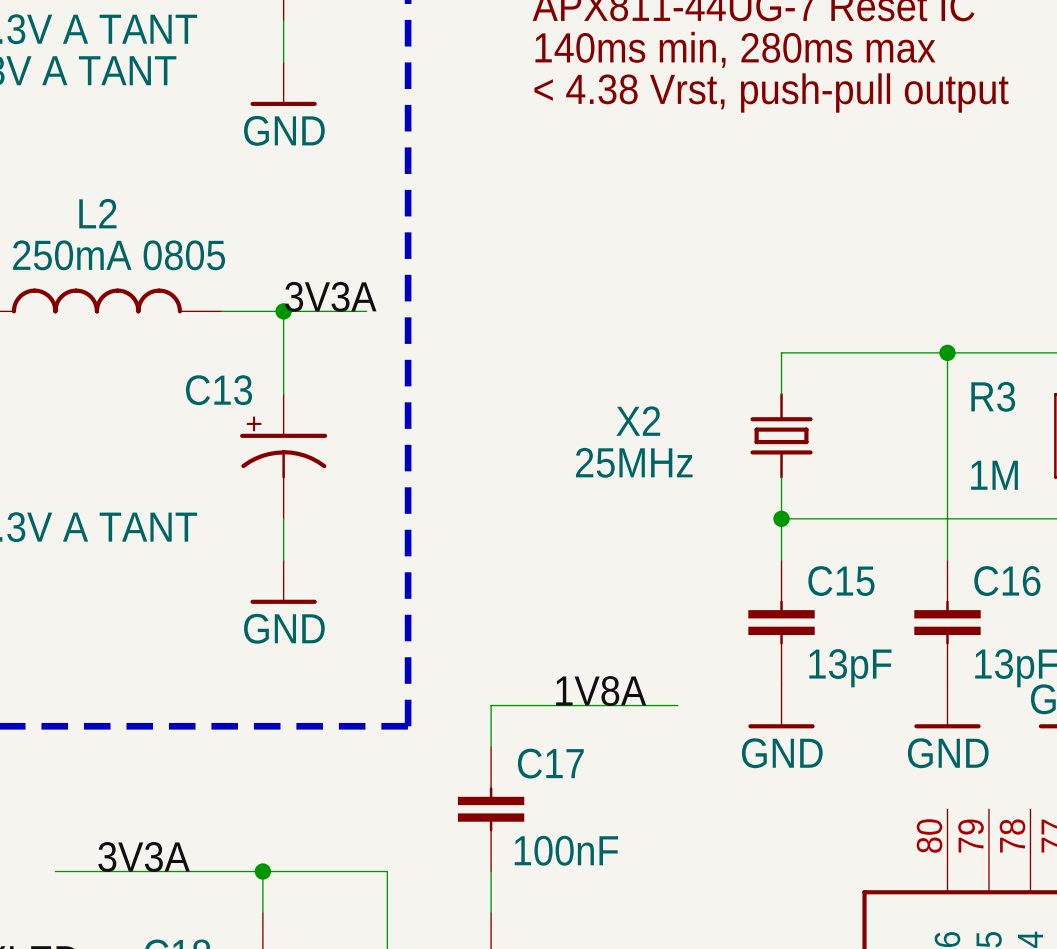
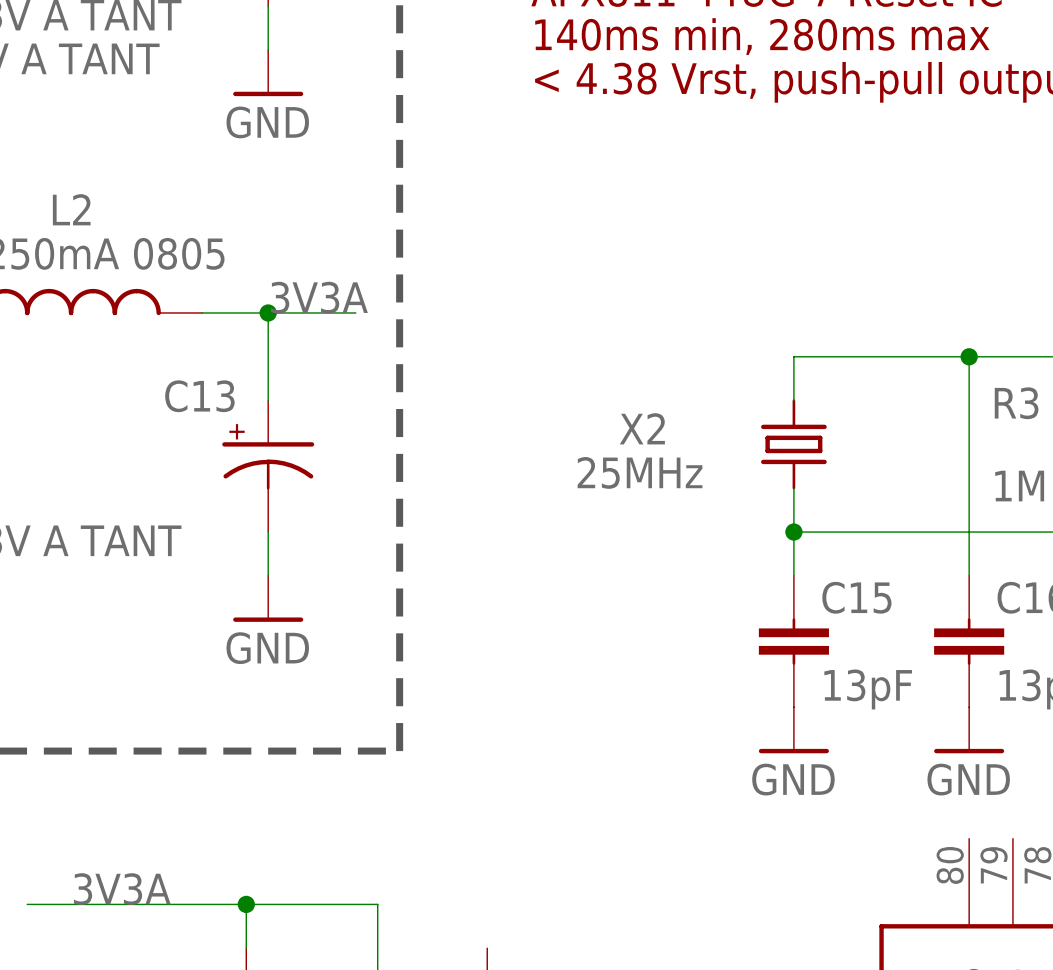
label: 1V8A (601, 691) -> none
wire: (677, 705) (491, 705) (491, 747) -> none
C17: 100nF (491, 809) -> none
wire: (491, 871) (491, 913) -> none

